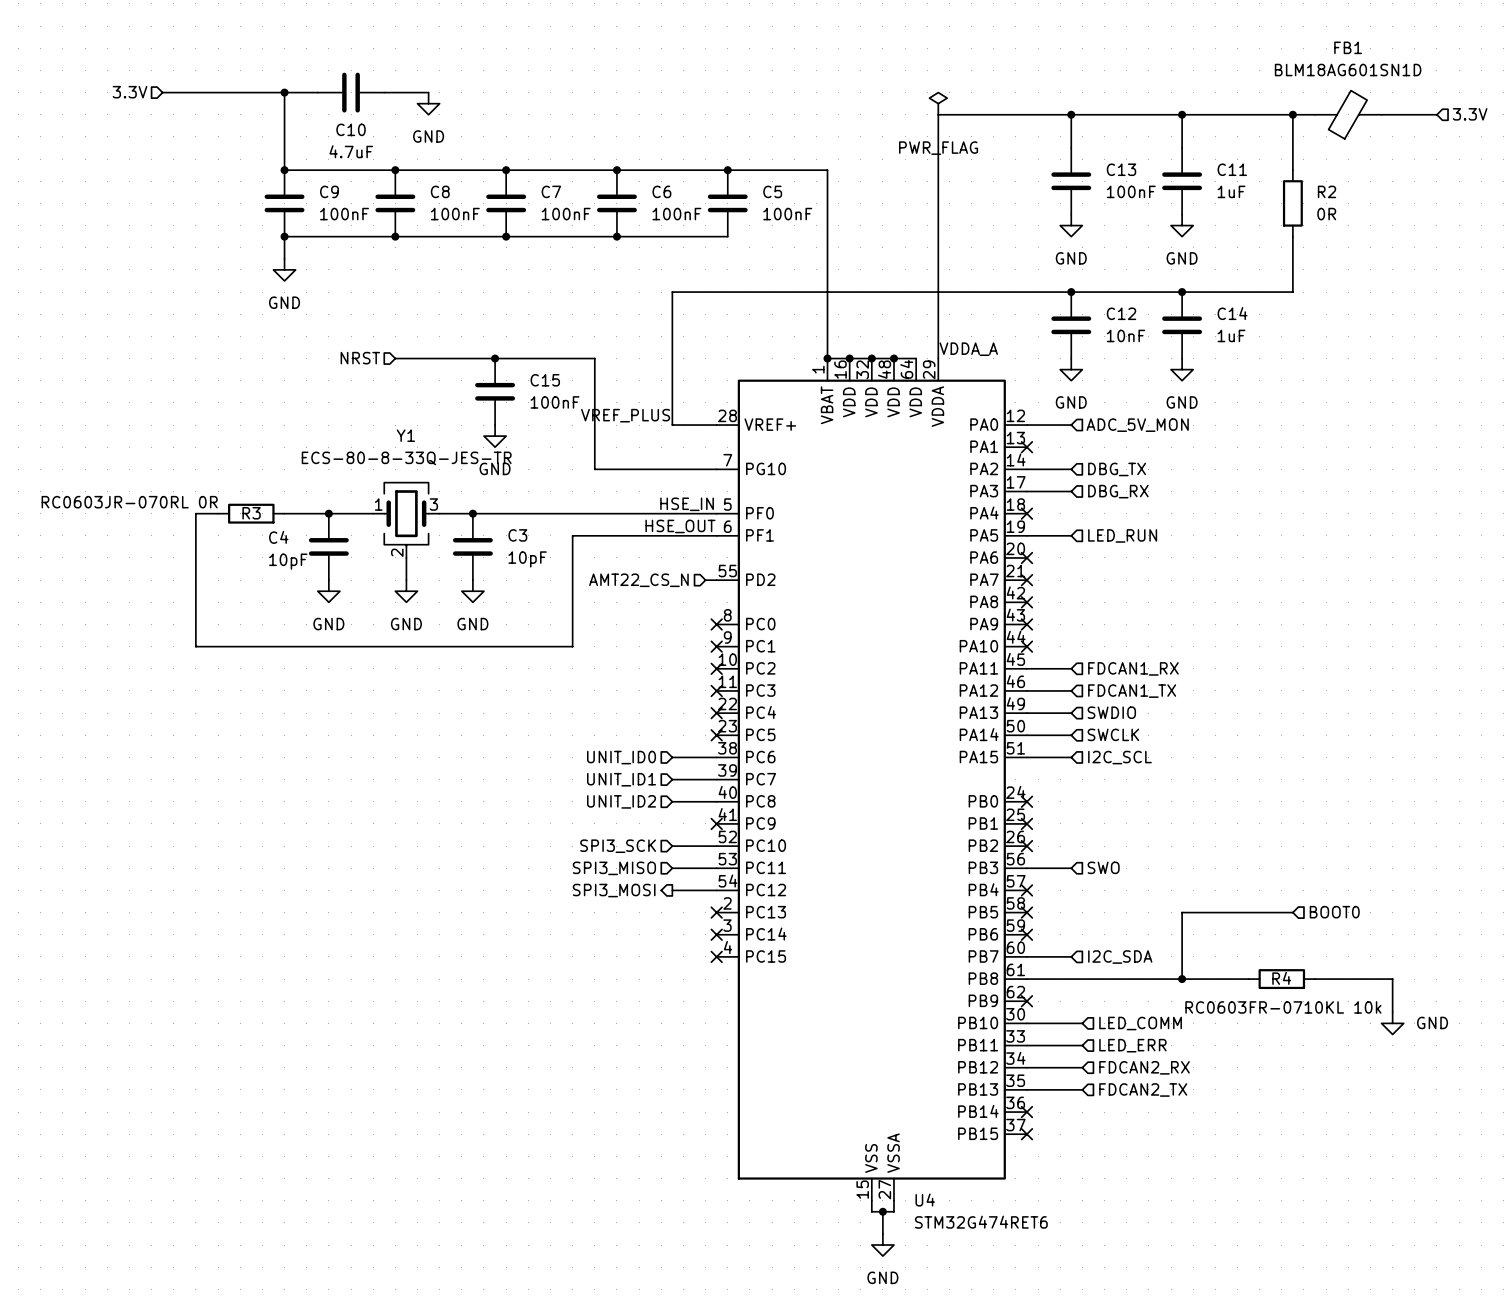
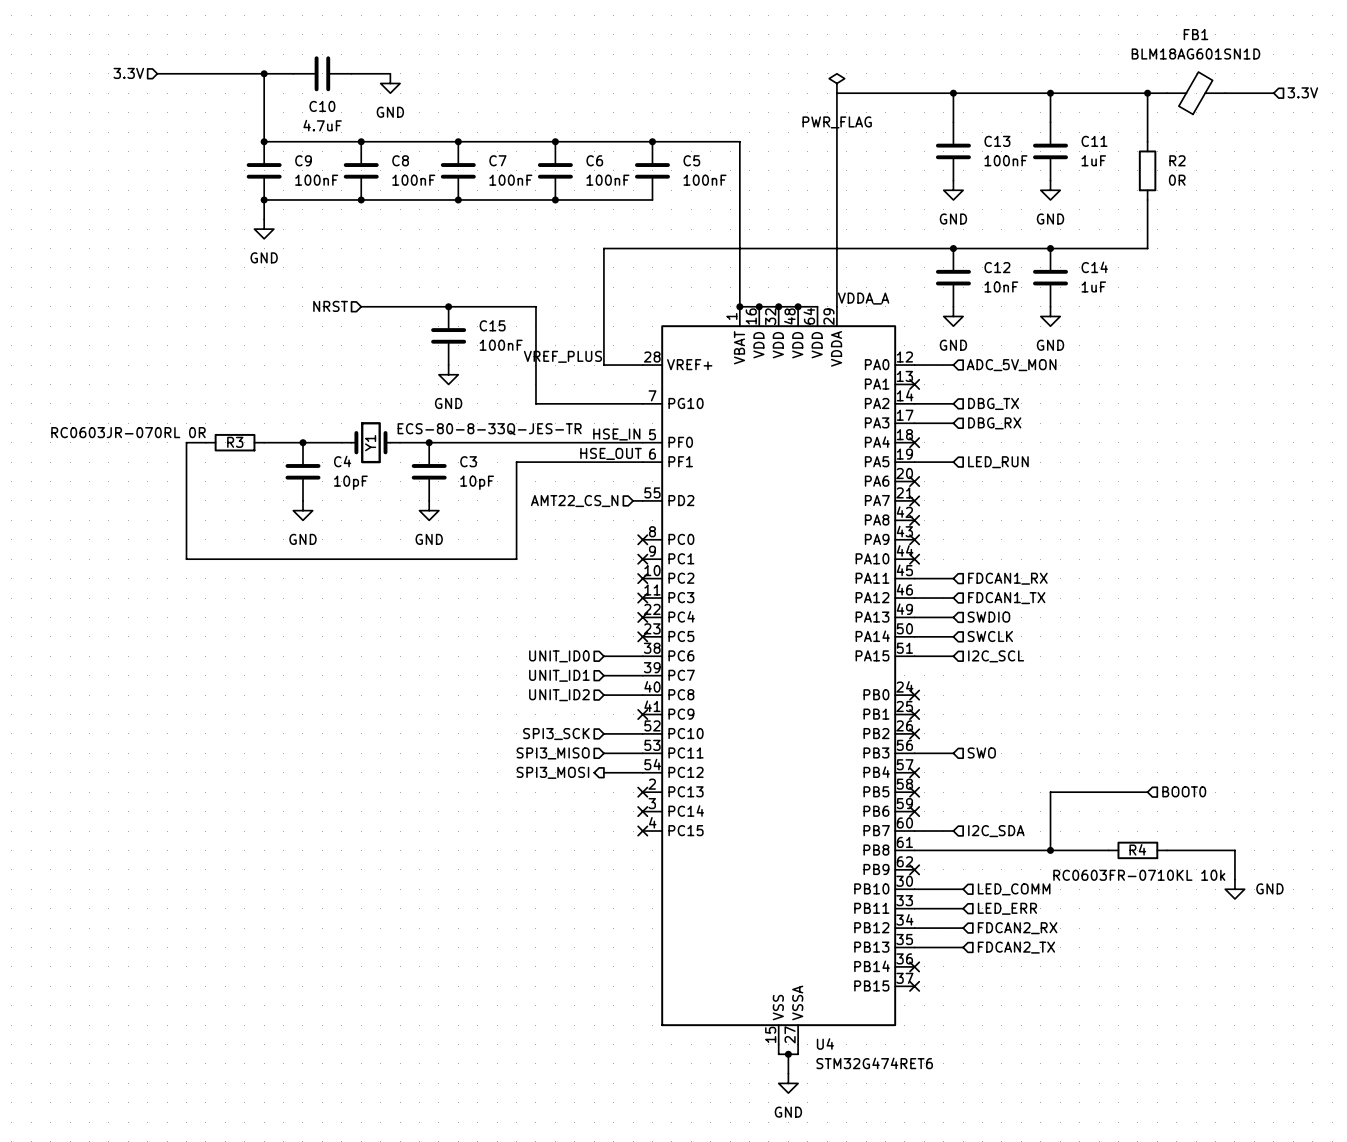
Y1 name position: Y1 (405, 435) -> Y1 (370, 443)
Y1 value position: ECS-80-8-33Q-JES-TR (406, 458) -> ECS-80-8-33Q-JES-TR (489, 429)
Y1 symbol: [373, 482, 440, 558] -> [341, 422, 401, 464]
C4 name position: C4 (278, 537) -> C4 (342, 461)
wire: (406, 557) (406, 580) -> none
C4 value position: 10pF (288, 561) -> 10pF (350, 482)
power symbol: GND (406, 591) -> none

